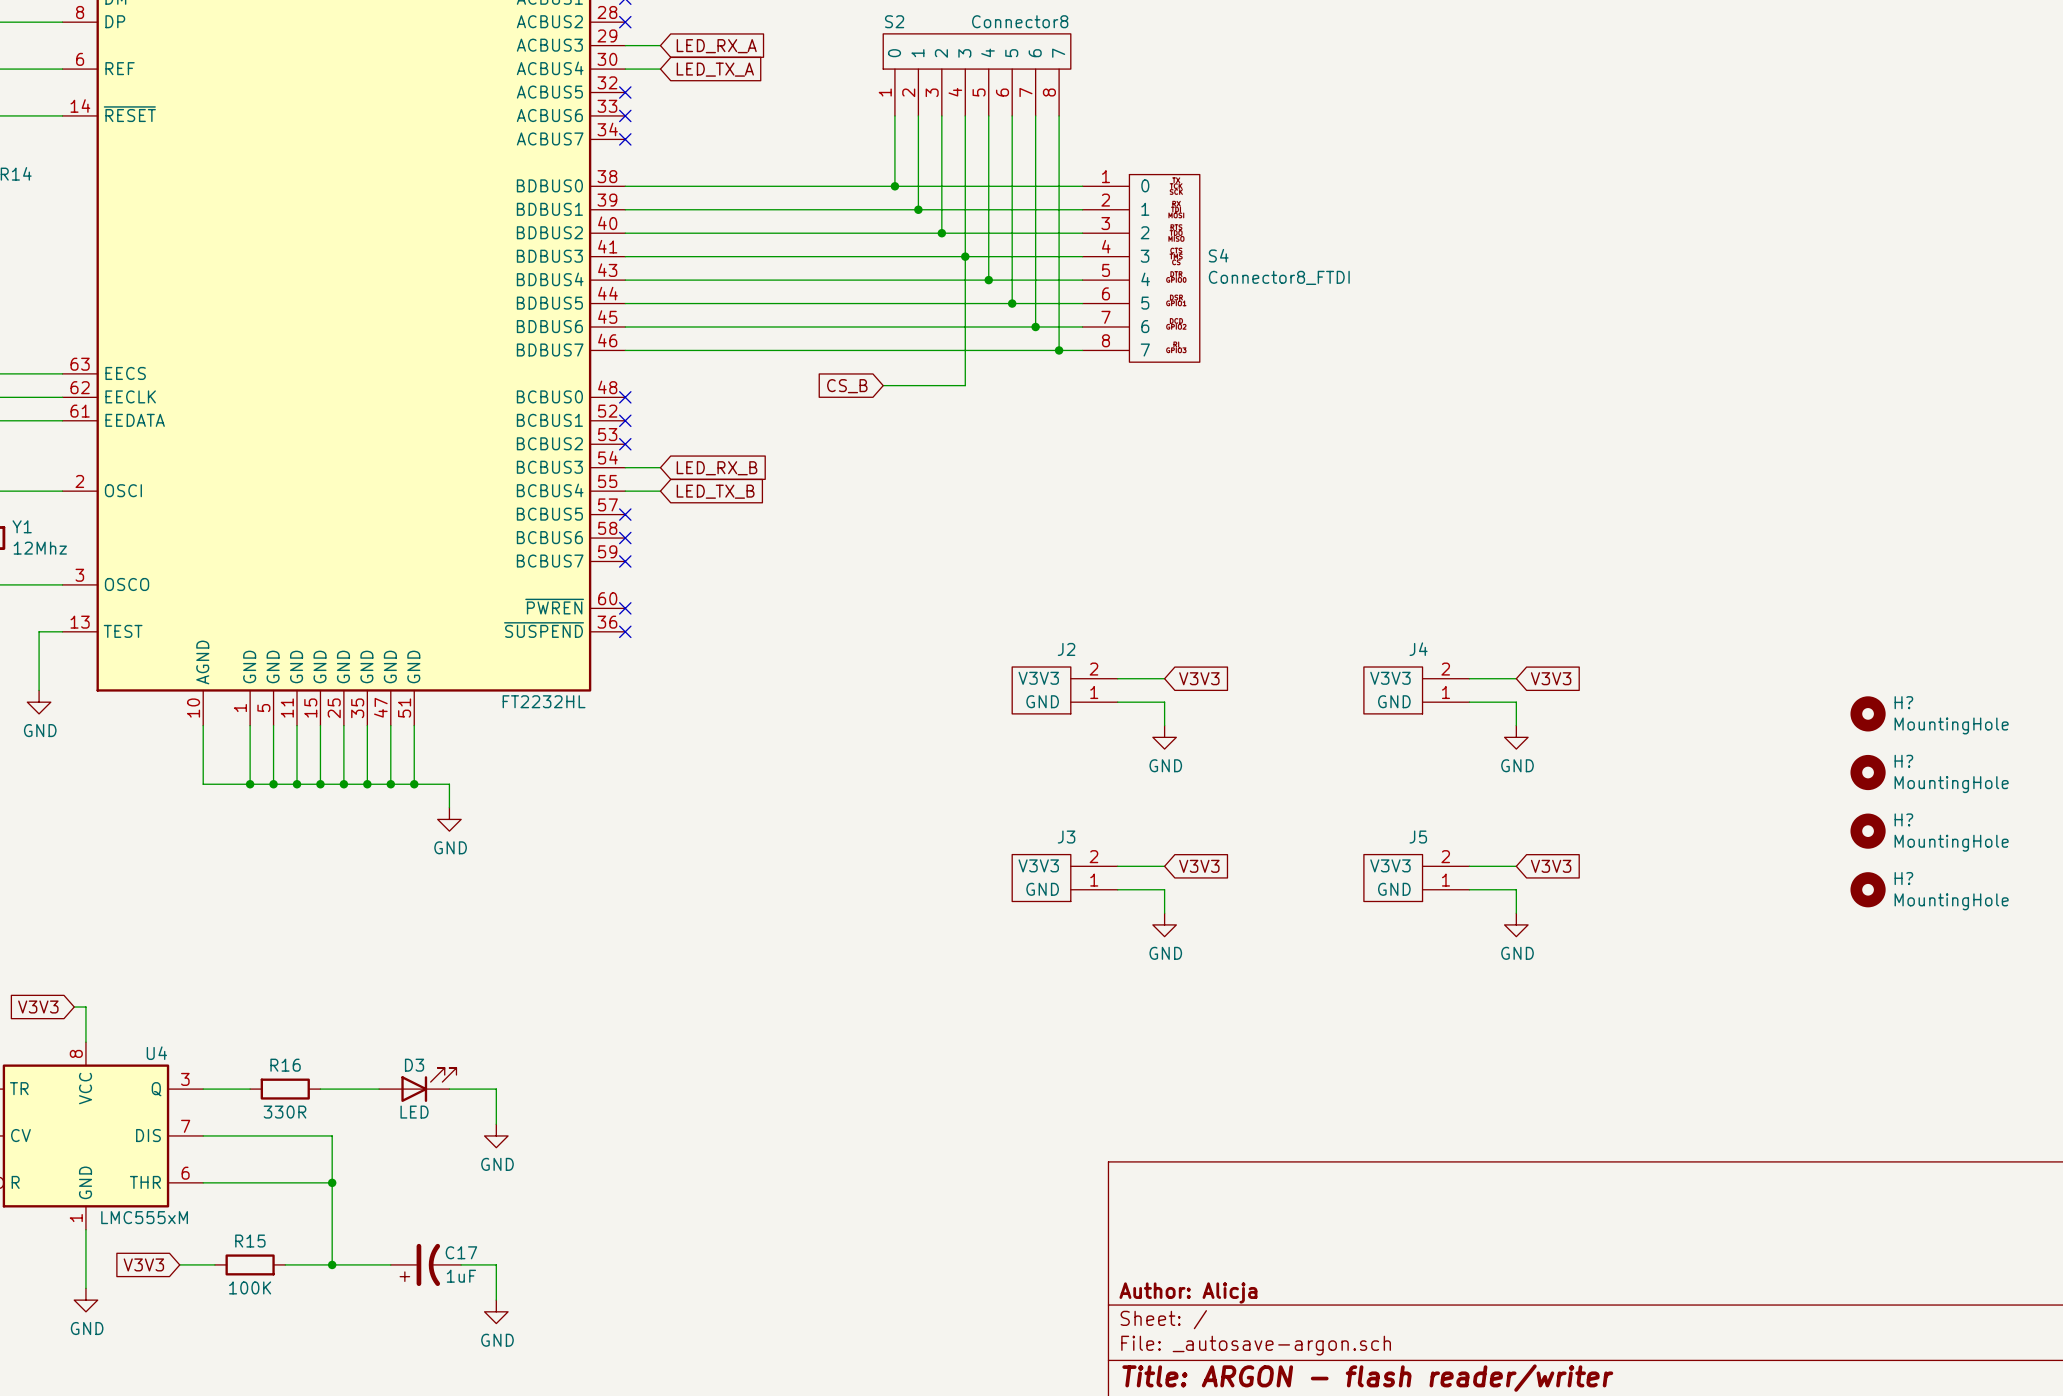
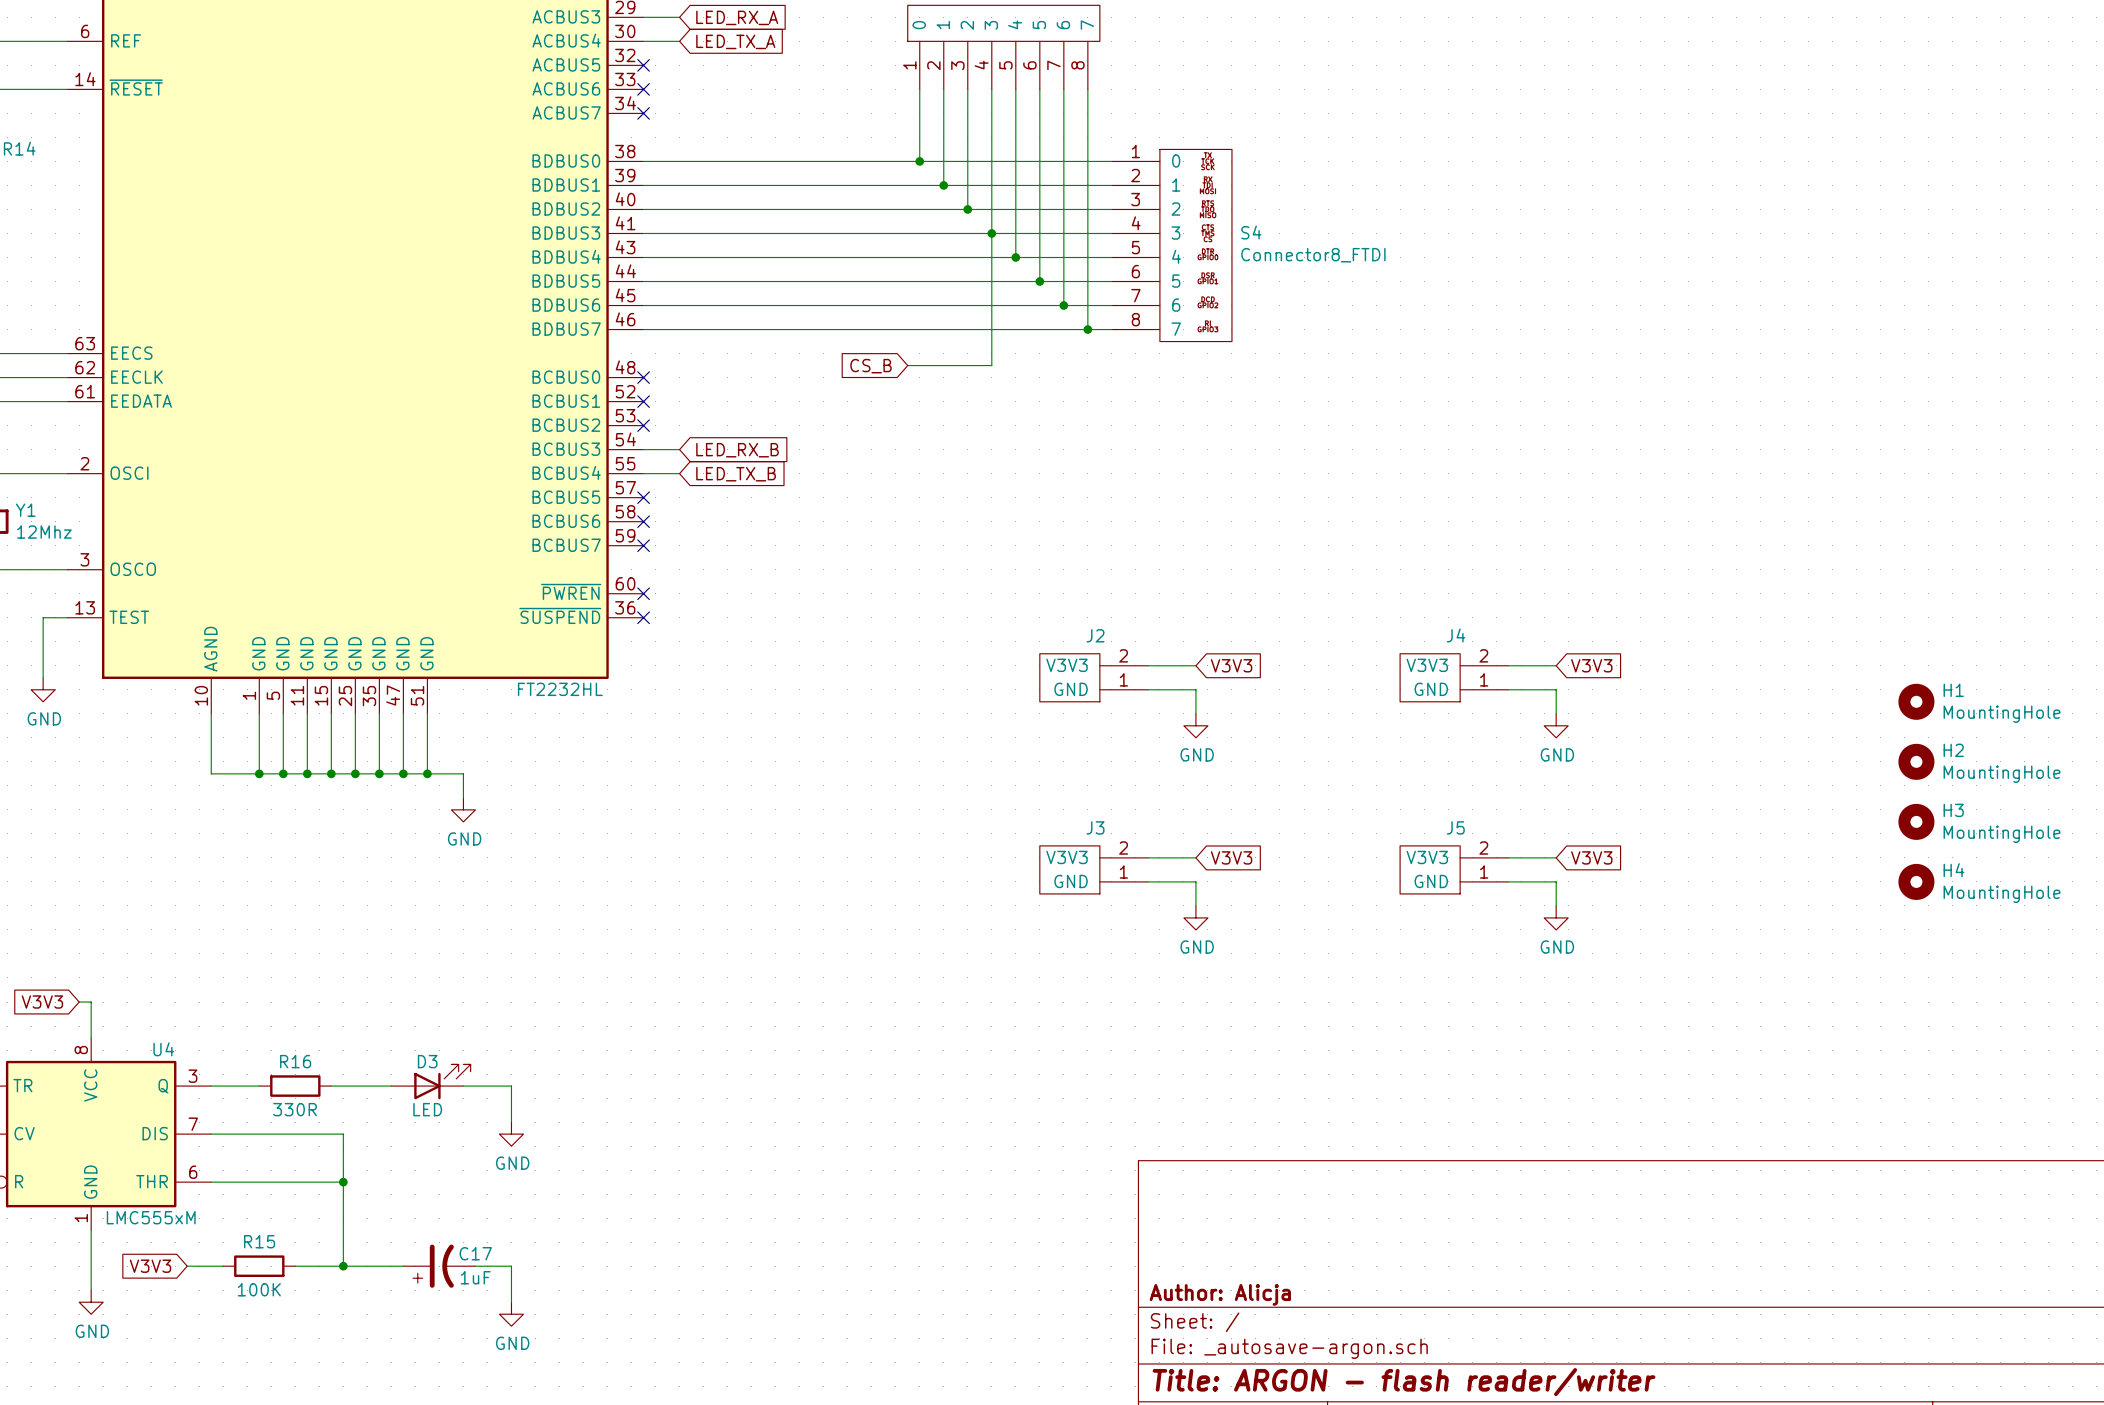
H? name: H? (1903, 702) -> H1 (1953, 690)
H? name: H? (1903, 761) -> H2 (1953, 750)
H? name: H? (1903, 819) -> H3 (1953, 810)
H? name: H? (1903, 878) -> H4 (1953, 870)

